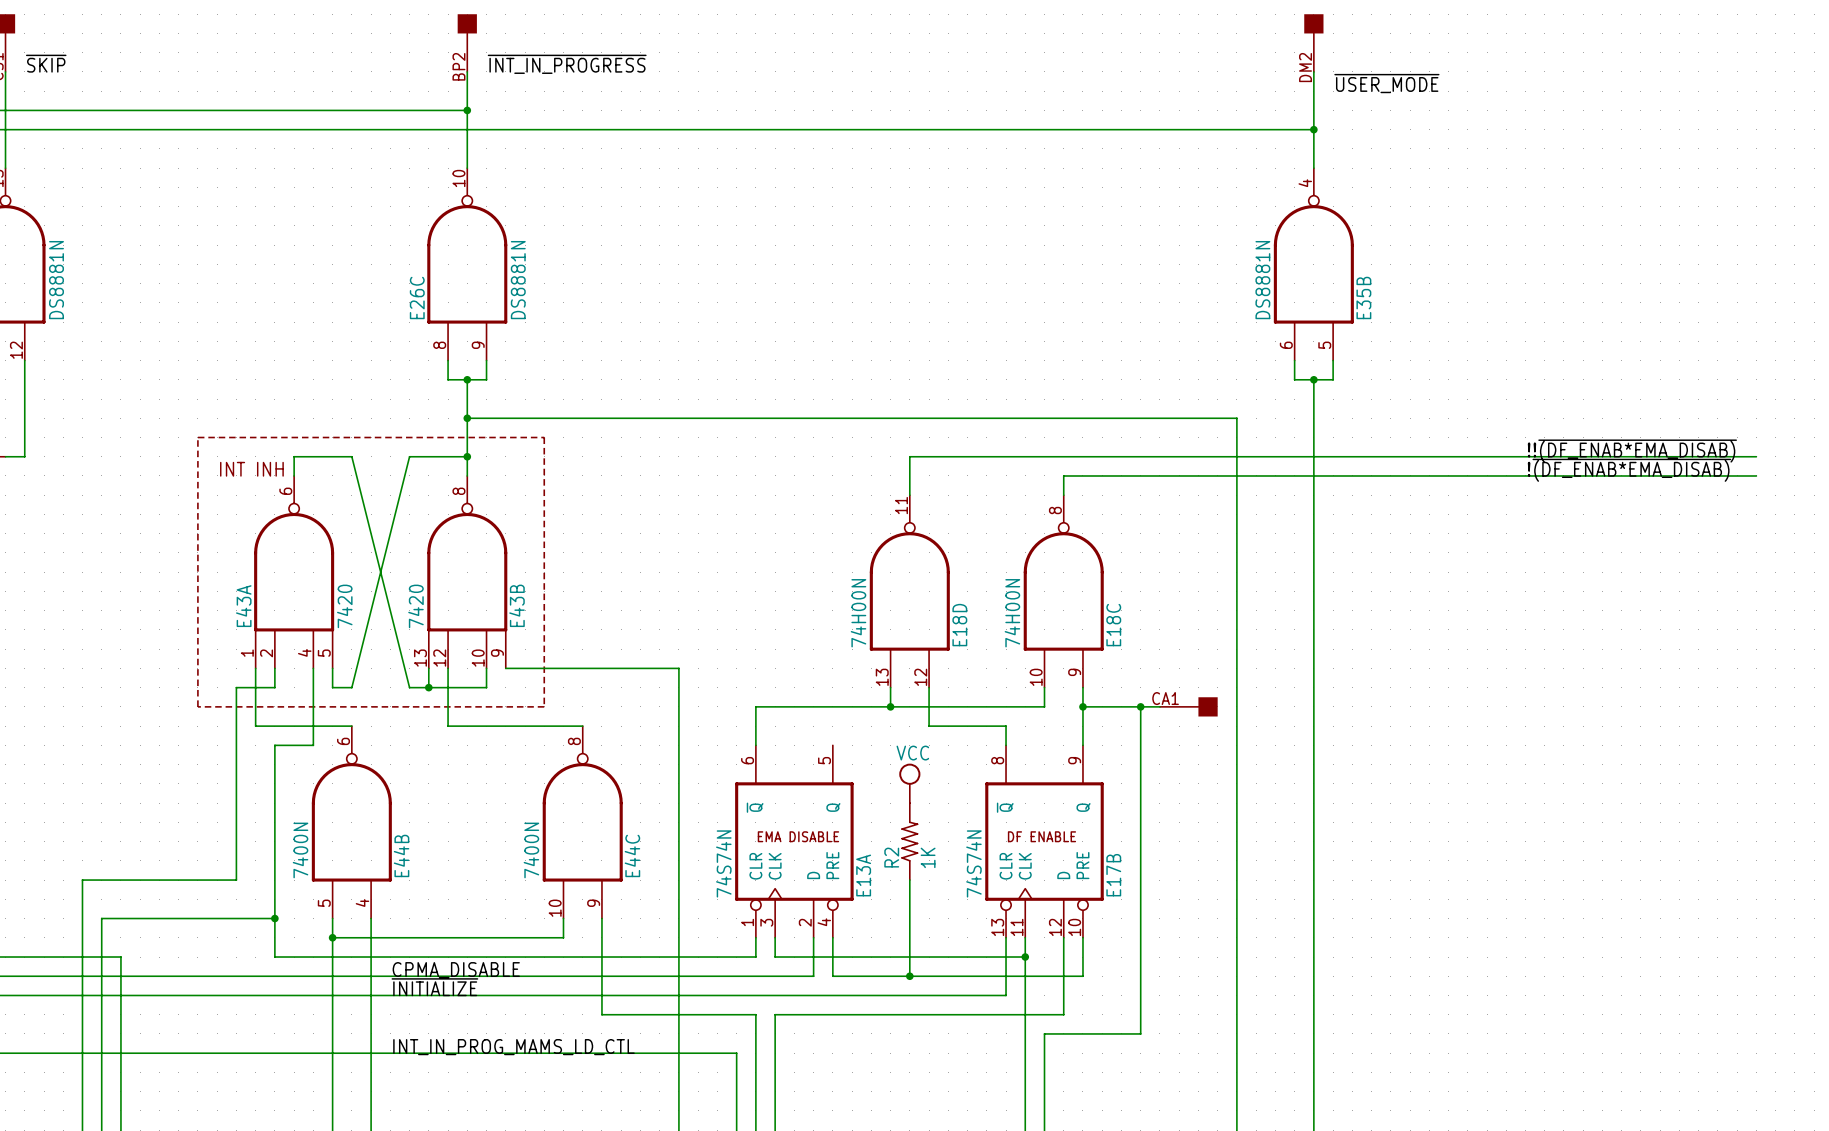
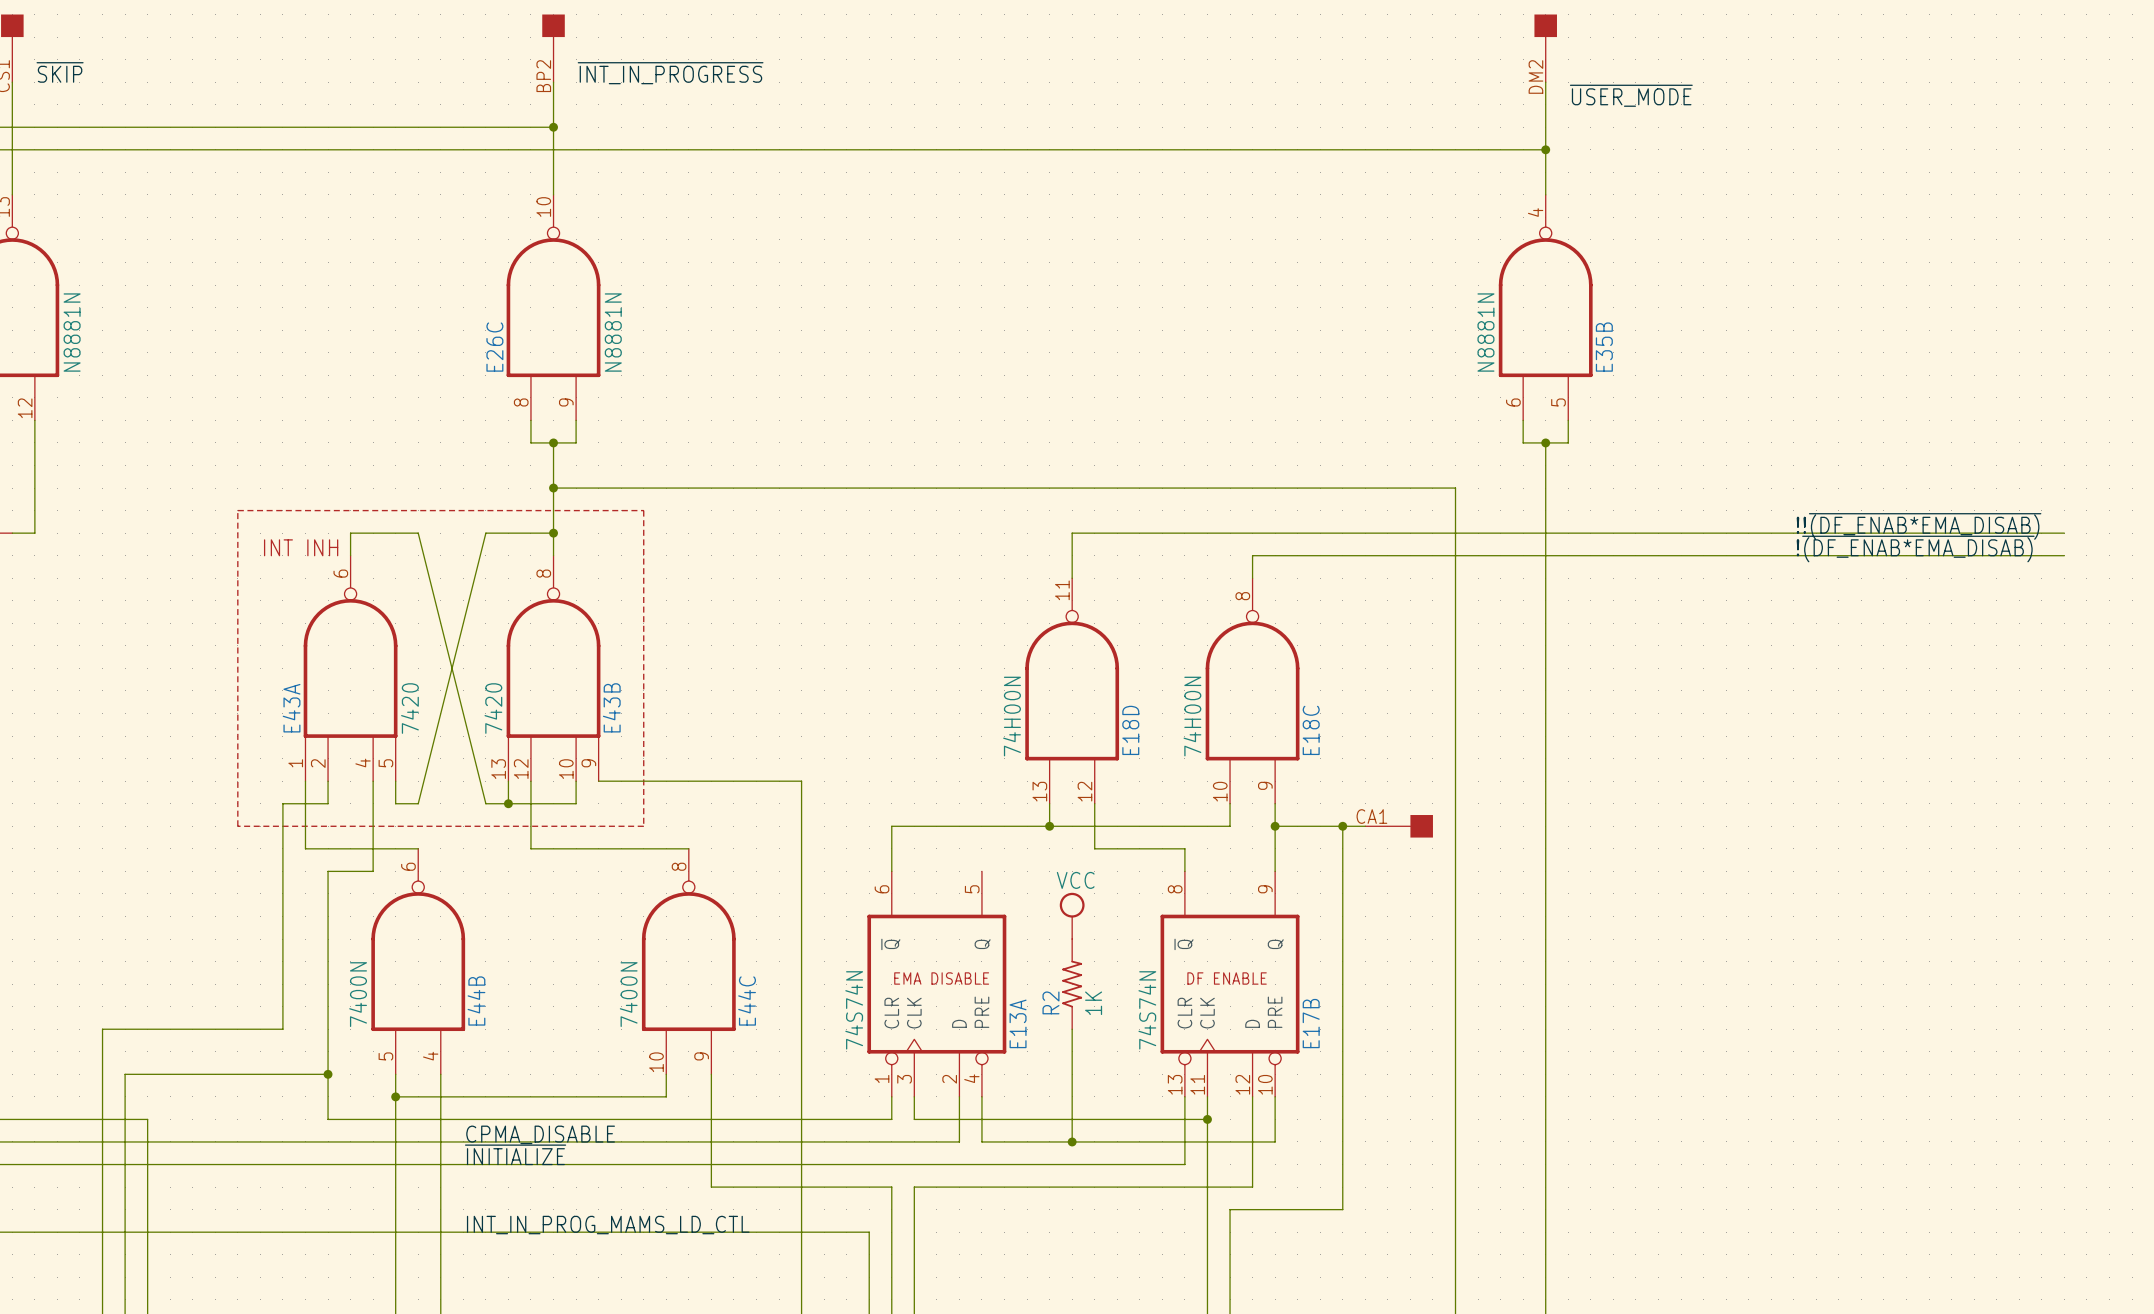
part value: DS8881N (56, 280) -> N8881N (72, 332)
E26C value: DS8881N (518, 280) -> N8881N (613, 332)
E35B value: DS8881N (1262, 280) -> N8881N (1485, 332)

